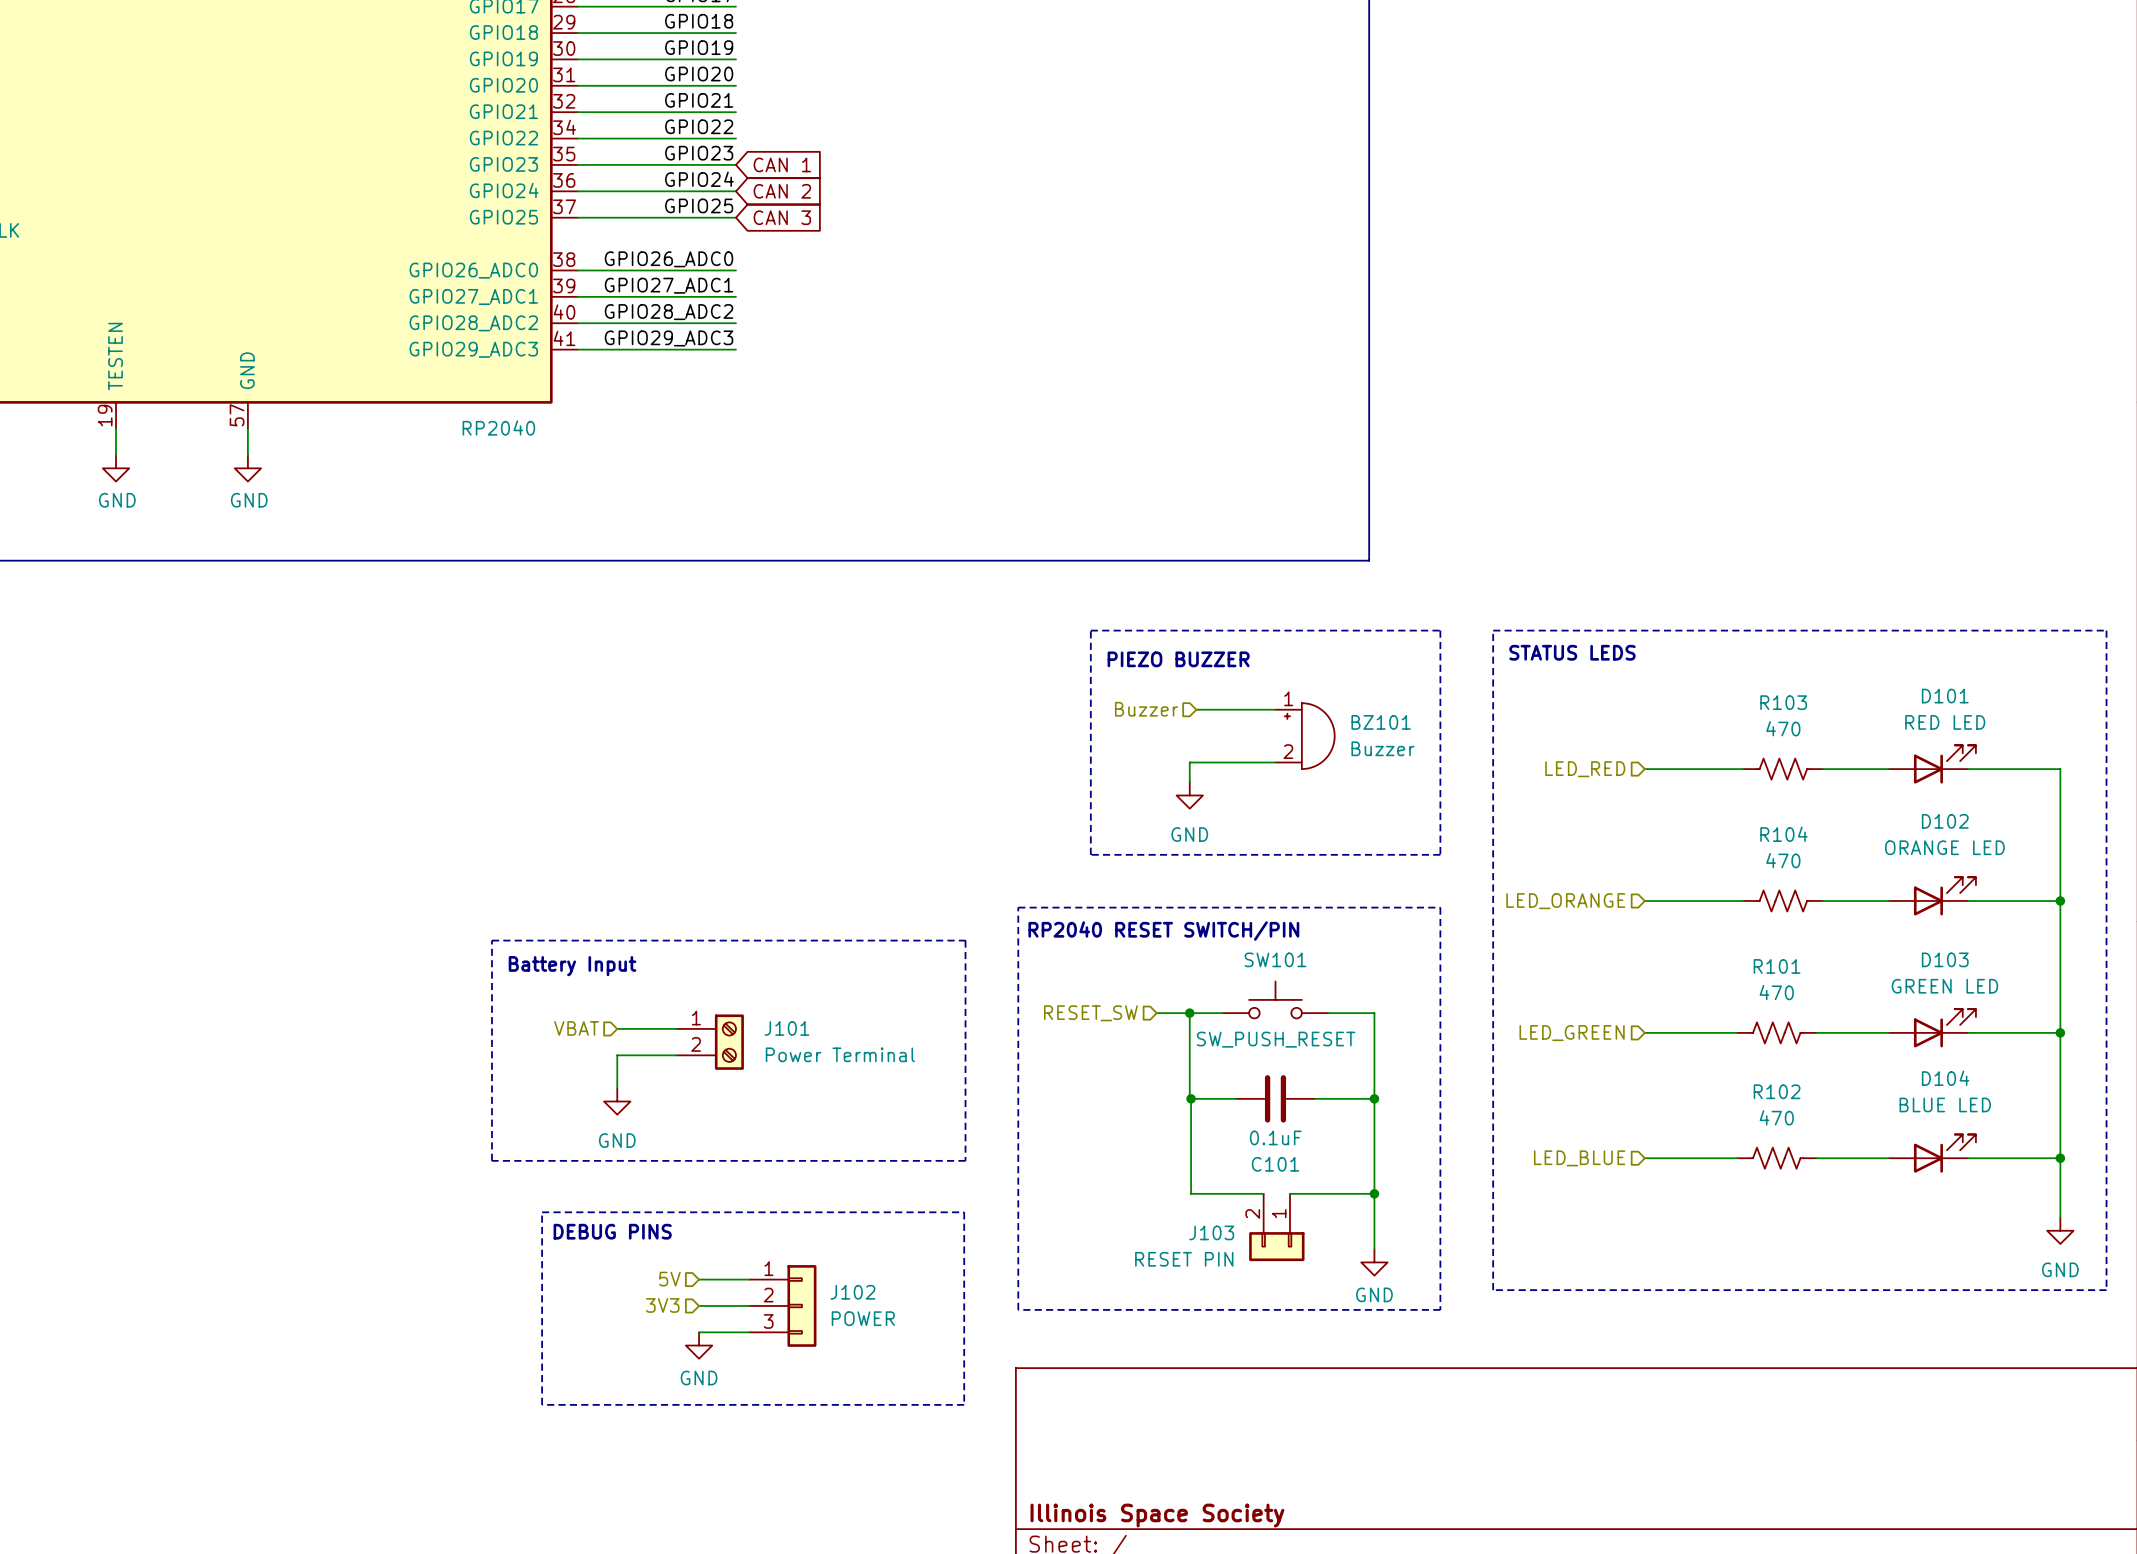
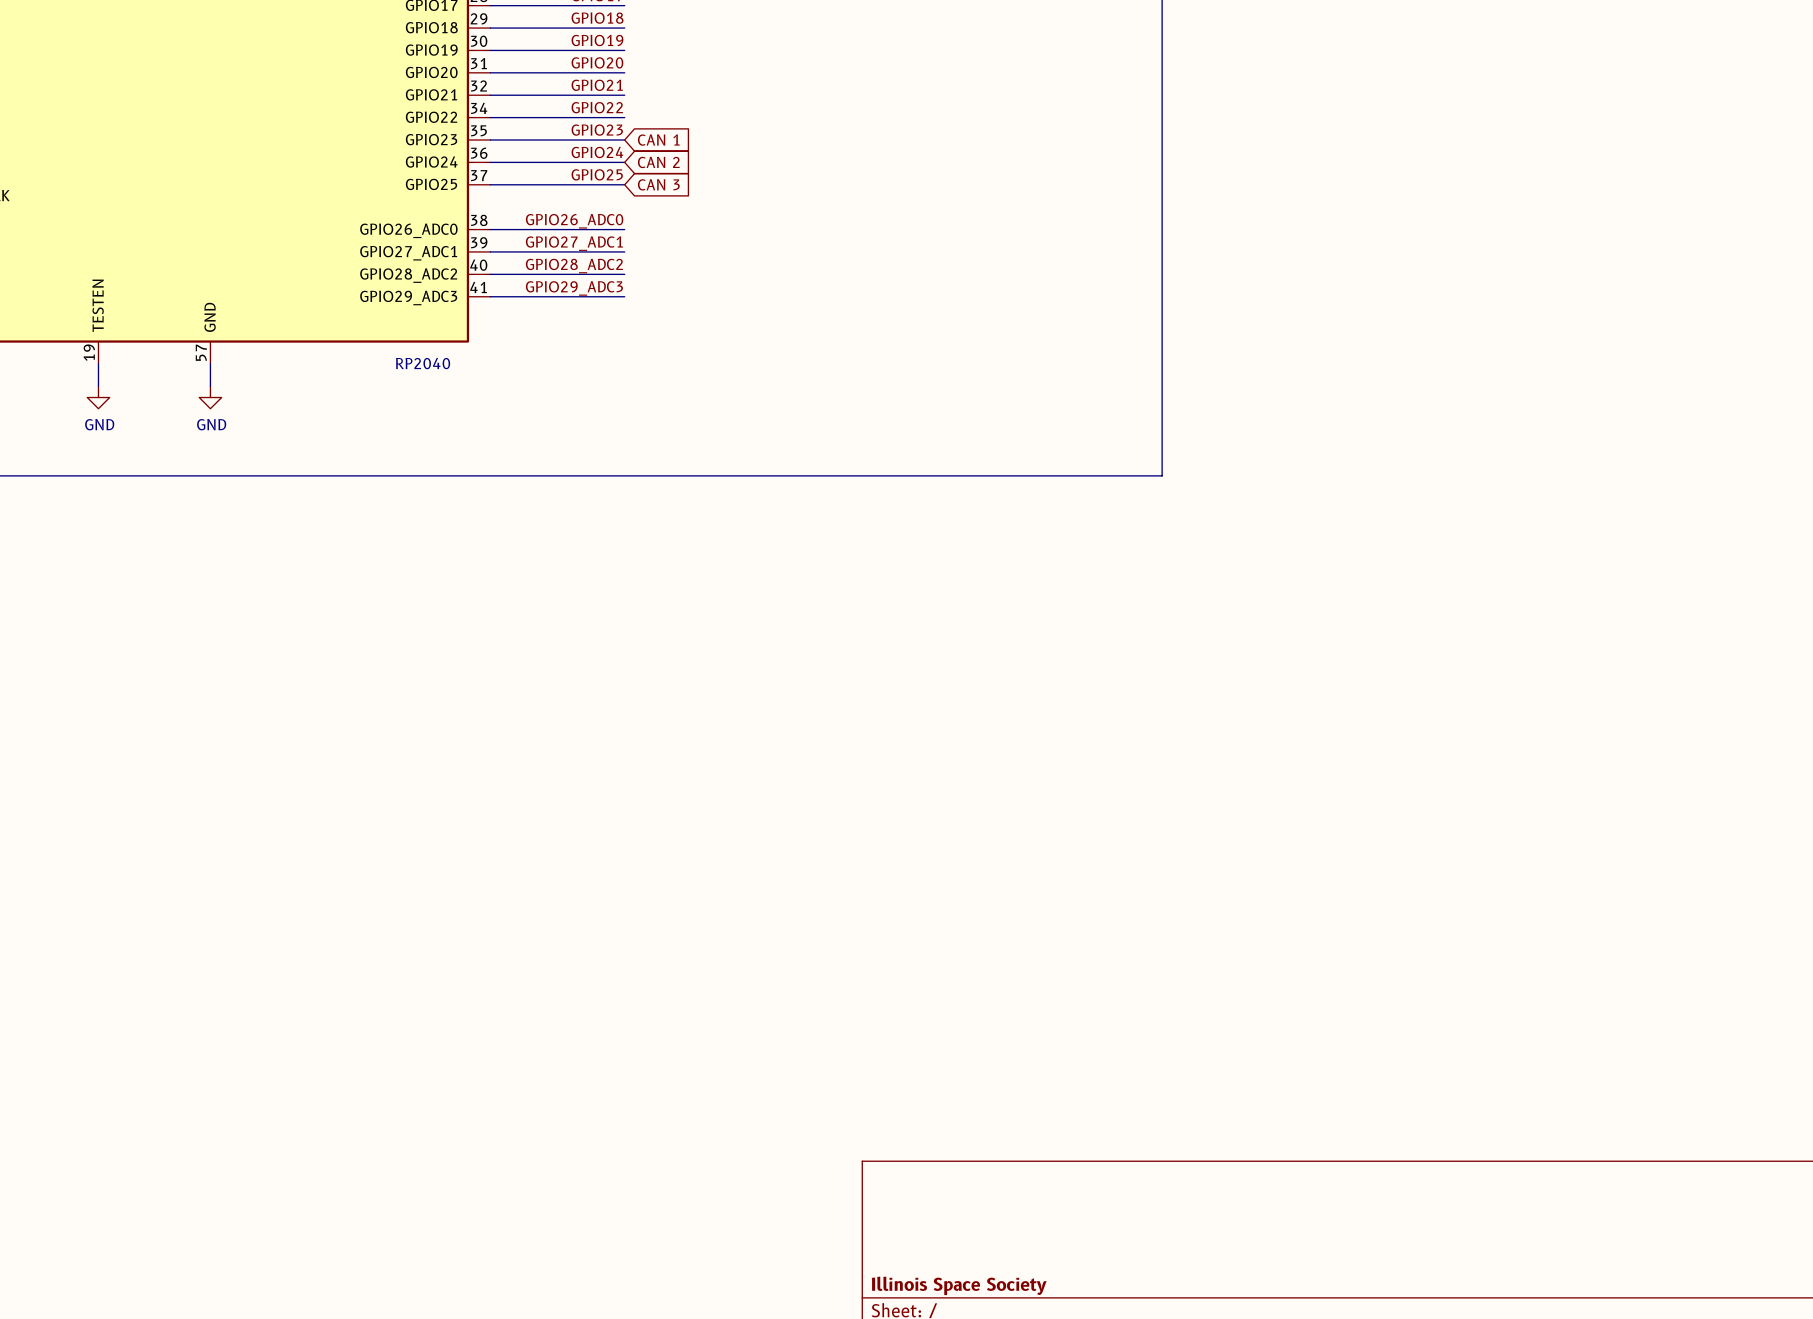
line: (1090, 630) (1440, 630) (1440, 854) (1090, 854) (1090, 630) -> none
line: (1493, 630) (2106, 630) (2106, 1290) (1493, 1290) (1493, 630) -> none
text: STATUS LEDS (1572, 652) -> none
text: PIEZO BUZZER (1178, 659) -> none
hierarchical label: Buzzer (1146, 709) -> none
wire: (1196, 709) (1275, 709) -> none
BZ101: Buzzer (1305, 736) -> none
wire: (1275, 762) (1189, 762) (1189, 782) -> none
D101: RED LED (1932, 764) -> none
hierarchical label: LED_RED (1585, 769) -> none
wire: (1644, 769) (1743, 769) -> none
R103: 470 (1783, 769) -> none
wire: (1822, 769) (1888, 769) -> none
wire: (1968, 769) (2060, 769) (2060, 1217) -> none
power symbol: GND (1189, 795) -> none
D102: ORANGE LED (1932, 896) -> none
hierarchical label: LED_ORANGE (1565, 901) -> none
wire: (1644, 901) (1743, 901) -> none
R104: 470 (1783, 901) -> none
wire: (1822, 901) (1888, 901) -> none
wire: (1968, 901) (2060, 901) -> none
junction: (2060, 901) -> none
line: (1018, 907) (1440, 907) (1440, 1309) (1018, 1309) (1018, 907) -> none
text: RP2040 RESET SWITCH/PIN (1163, 931) -> none
line: (491, 940) (965, 940) (965, 1160) (491, 1160) (491, 940) -> none
text: Battery Input (572, 966) -> none
SW101: SW_PUSH_RESET (1275, 999) -> none
hierarchical label: RESET_SW (1090, 1013) -> none
wire: (1156, 1013) (1222, 1013) -> none
wire: (1189, 1013) (1189, 1098) (1235, 1098) -> none
junction: (1189, 1013) -> none
wire: (1328, 1013) (1374, 1013) (1374, 1249) -> none
hierarchical label: VBAT (576, 1028) -> none
wire: (617, 1028) (676, 1028) -> none
D103: GREEN LED (1932, 1028) -> none
wire: (1644, 1032) (1737, 1032) -> none
R101: 470 (1776, 1032) -> none
wire: (1816, 1032) (1888, 1032) -> none
wire: (1968, 1032) (2060, 1032) -> none
junction: (2060, 1032) -> none
hierarchical label: LED_GREEN (1572, 1033) -> none
J101: Power Terminal (710, 1042) -> none
wire: (676, 1055) (617, 1055) (617, 1088) -> none
wire: (1191, 1098) (1191, 1193) (1263, 1193) -> none
junction: (1191, 1098) -> none
C101: 0.1uF (1275, 1098) -> none
wire: (1315, 1098) (1374, 1098) -> none
junction: (1374, 1098) -> none
power symbol: GND (617, 1101) -> none
D104: BLUE LED (1932, 1153) -> none
hierarchical label: LED_BLUE (1579, 1158) -> none
wire: (1644, 1158) (1737, 1158) -> none
R102: 470 (1776, 1158) -> none
wire: (1816, 1158) (1888, 1158) -> none
wire: (1968, 1158) (2060, 1158) -> none
junction: (2060, 1158) -> none
wire: (1290, 1193) (1374, 1193) -> none
junction: (1374, 1193) -> none
line: (542, 1212) (964, 1212) (964, 1404) (542, 1404) (542, 1212) -> none
J103: RESET PIN (1276, 1227) -> none
power symbol: GND (2060, 1230) -> none
text: DEBUG PINS (612, 1231) -> none
power symbol: GND (1374, 1262) -> none
hierarchical label: 5V (669, 1279) -> none
wire: (699, 1279) (749, 1279) -> none
hierarchical label: 3V3 (662, 1305) -> none
wire: (699, 1305) (749, 1305) -> none
J102: POWER (782, 1305) -> none
wire: (699, 1332) (749, 1332) -> none
power symbol: GND (699, 1345) -> none

